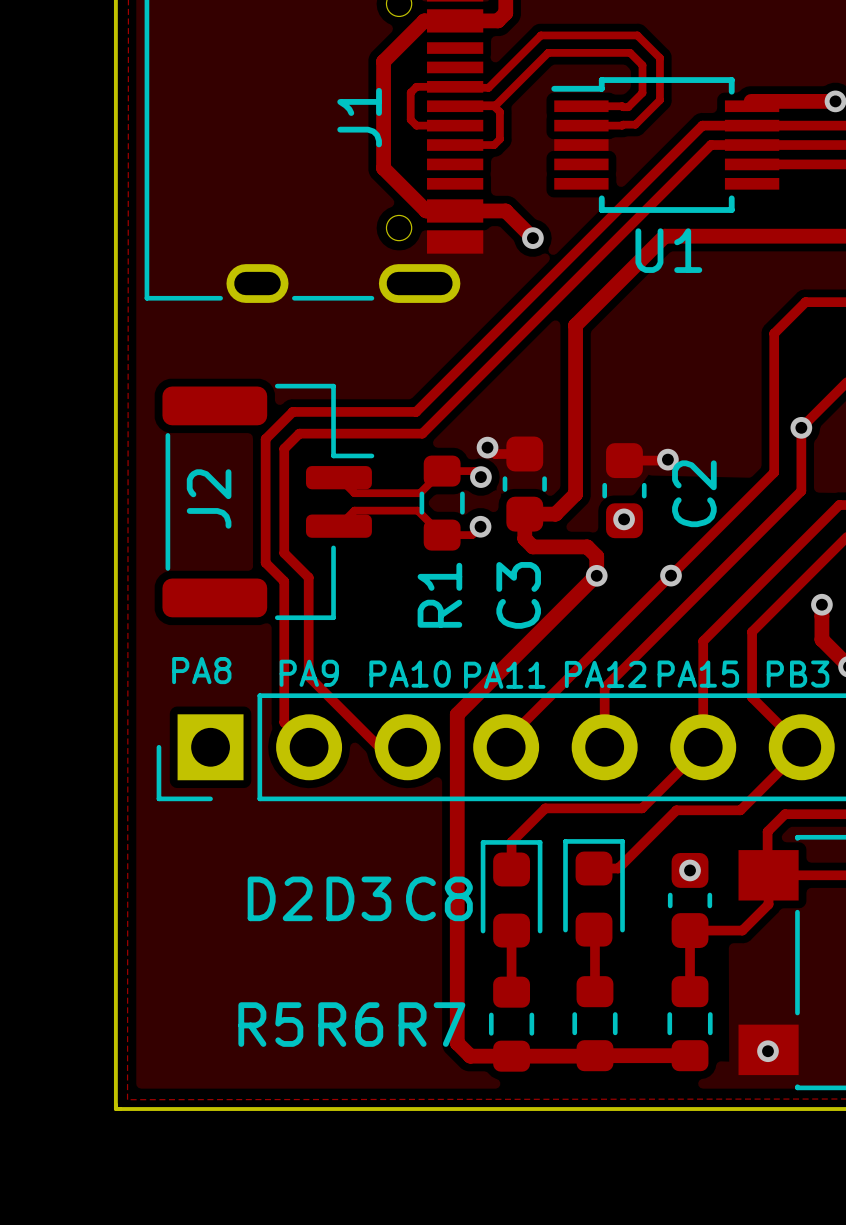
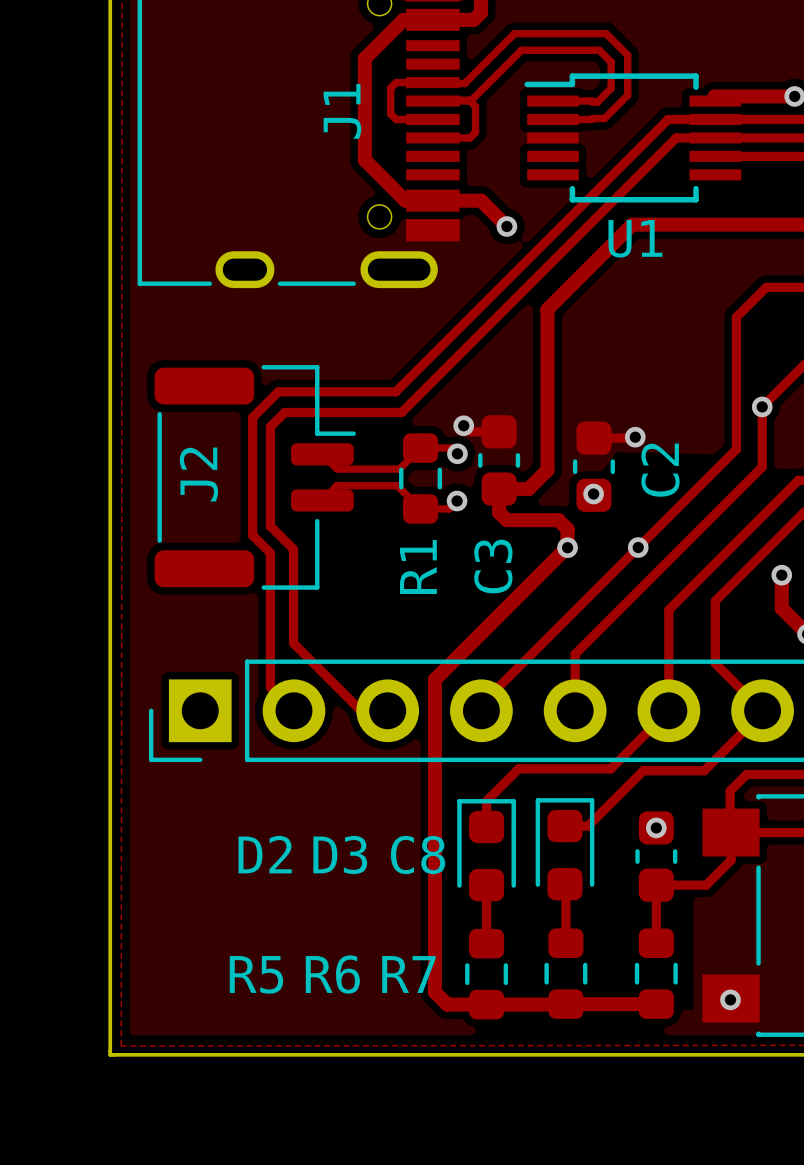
text: PA8 (201, 670) -> none
text: PA9 (309, 673) -> none
text: PA10 (410, 674) -> none
text: PA12 (605, 674) -> none
text: PA15 (698, 674) -> none
text: PB3 (798, 674) -> none
text: PA11 (504, 675) -> none

